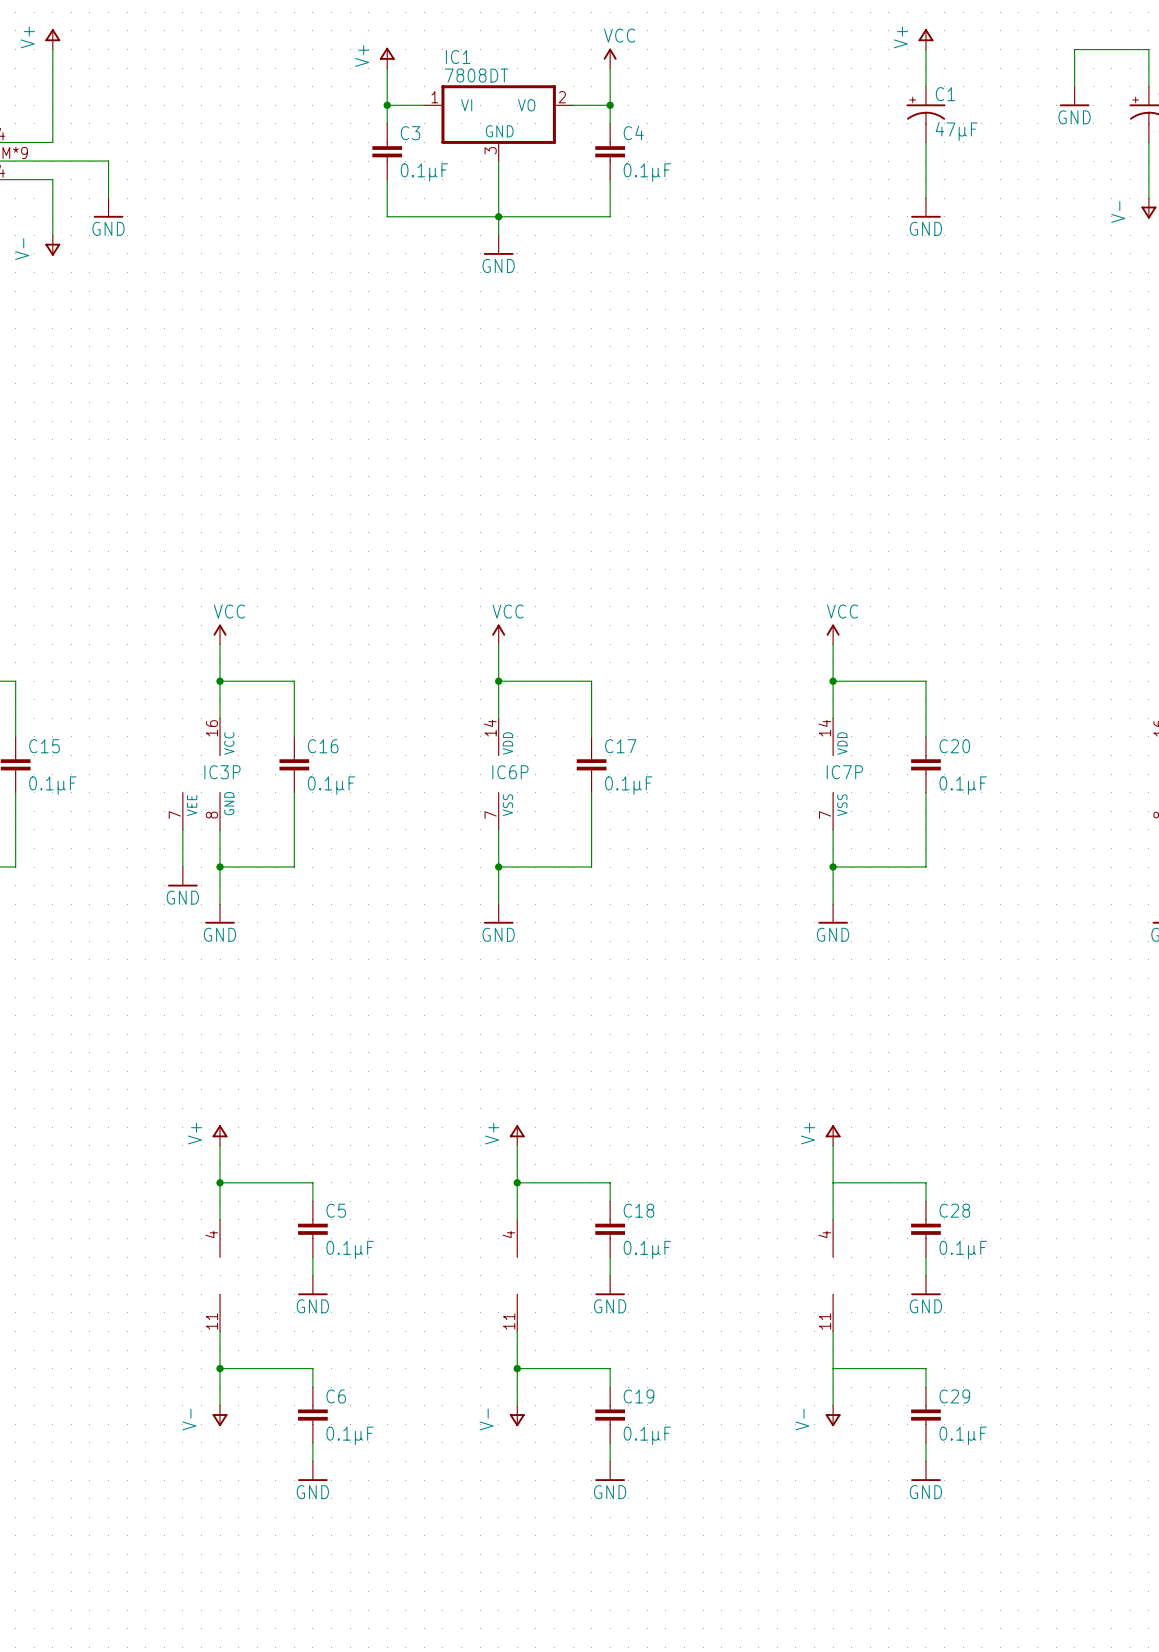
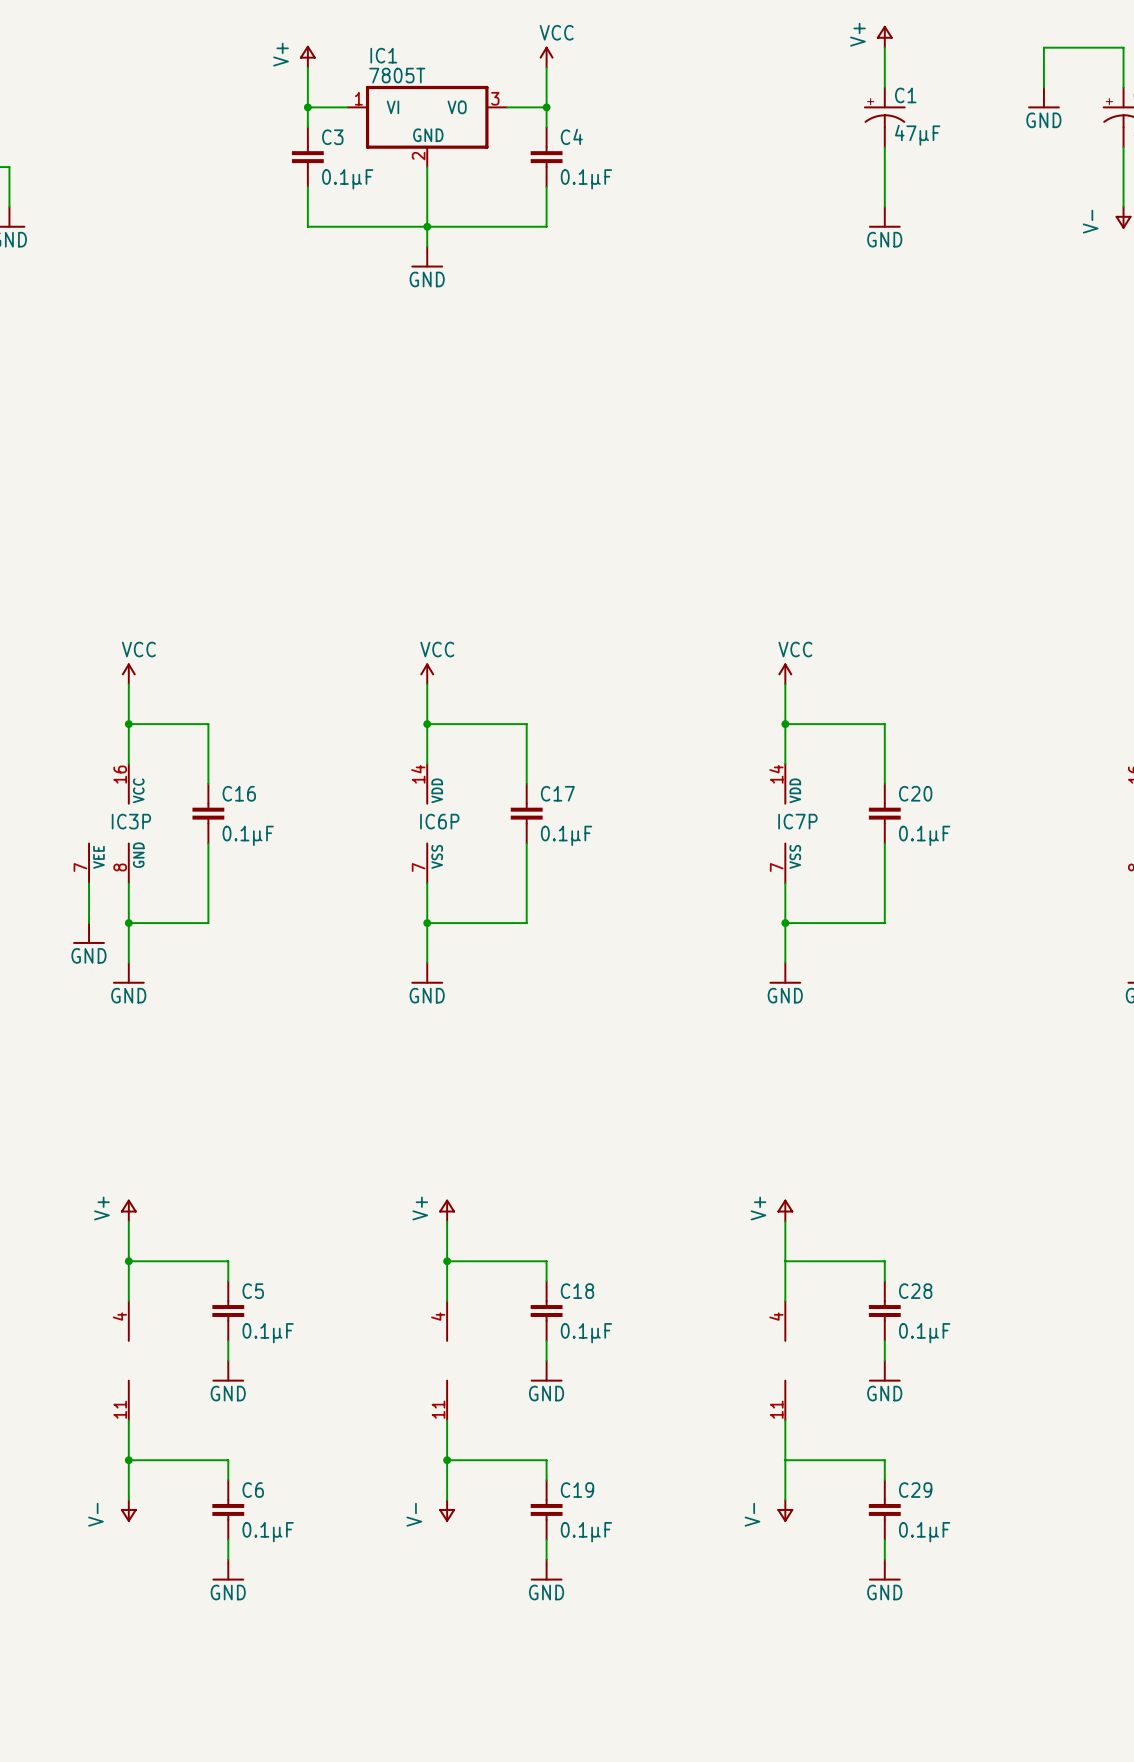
IC1 value: 7808DT (476, 75) -> 7805T (397, 75)
IC1 pin number: 2 (562, 97) -> 3 (495, 98)
IC1 pin number: 3 (490, 150) -> 2 (418, 156)

